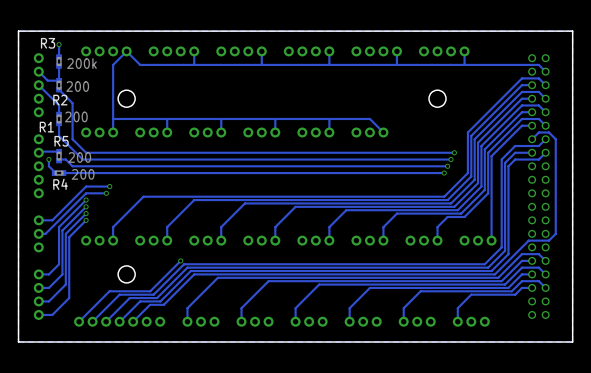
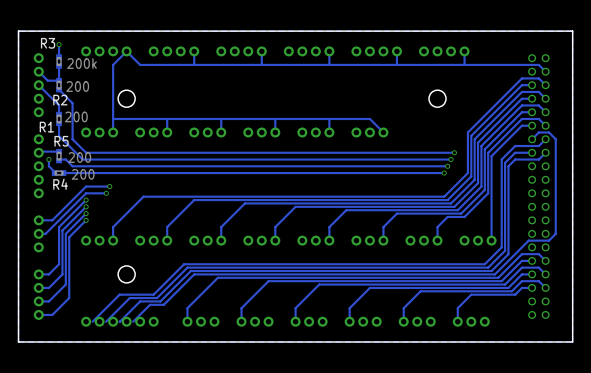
track: (180, 260) (150, 291) (109, 291) (79, 321) -> none
via: (180, 260) -> none
part footprint: [74, 316, 166, 327] -> [81, 316, 159, 327]

